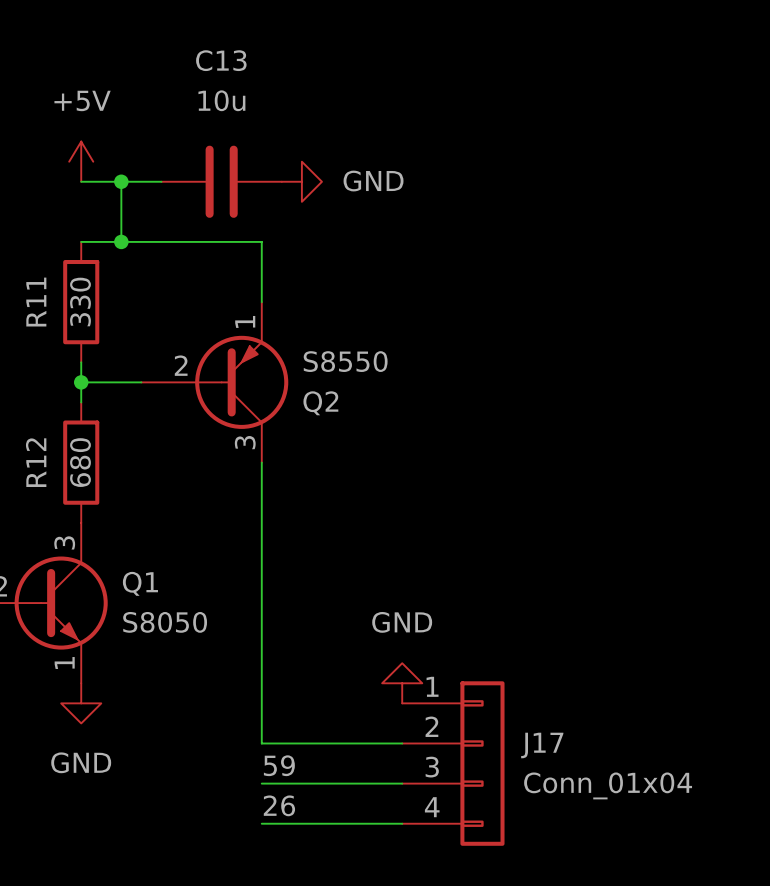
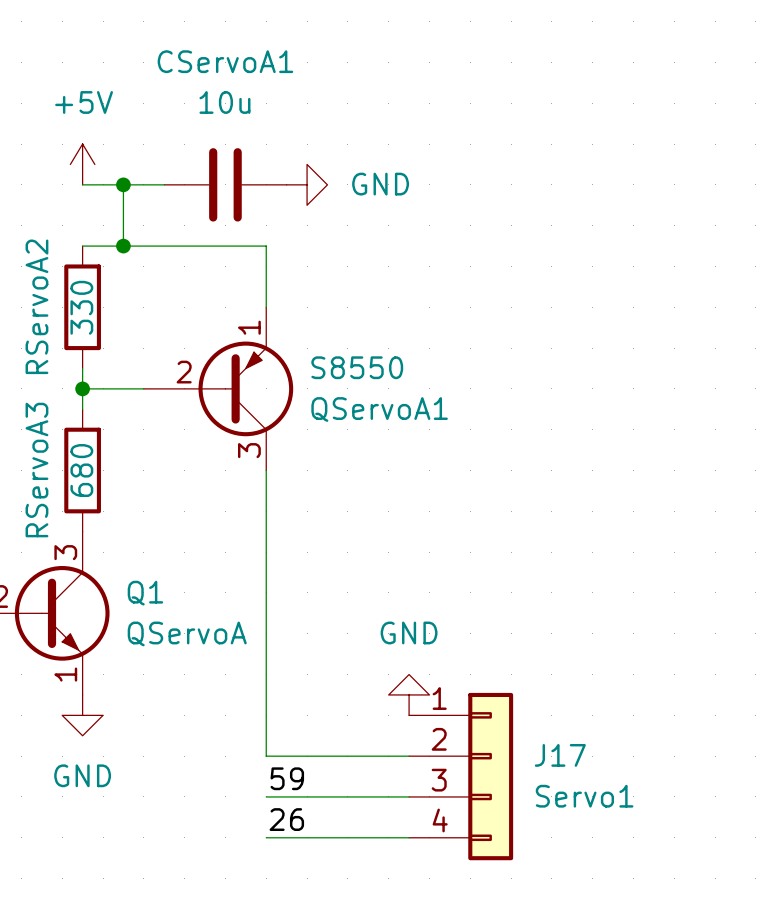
C13 name: C13 (221, 60) -> CServoA1 (225, 61)
R11 name: R11 (36, 302) -> RServoA2 (36, 306)
Q2 name: Q2 (320, 403) -> QServoA1 (379, 409)
R12 name: R12 (36, 462) -> RServoA3 (36, 470)
Q1 value: S8050 (165, 622) -> QServoA (187, 633)
J17 value: Conn_01x04 (608, 785) -> Servo1 (584, 796)

